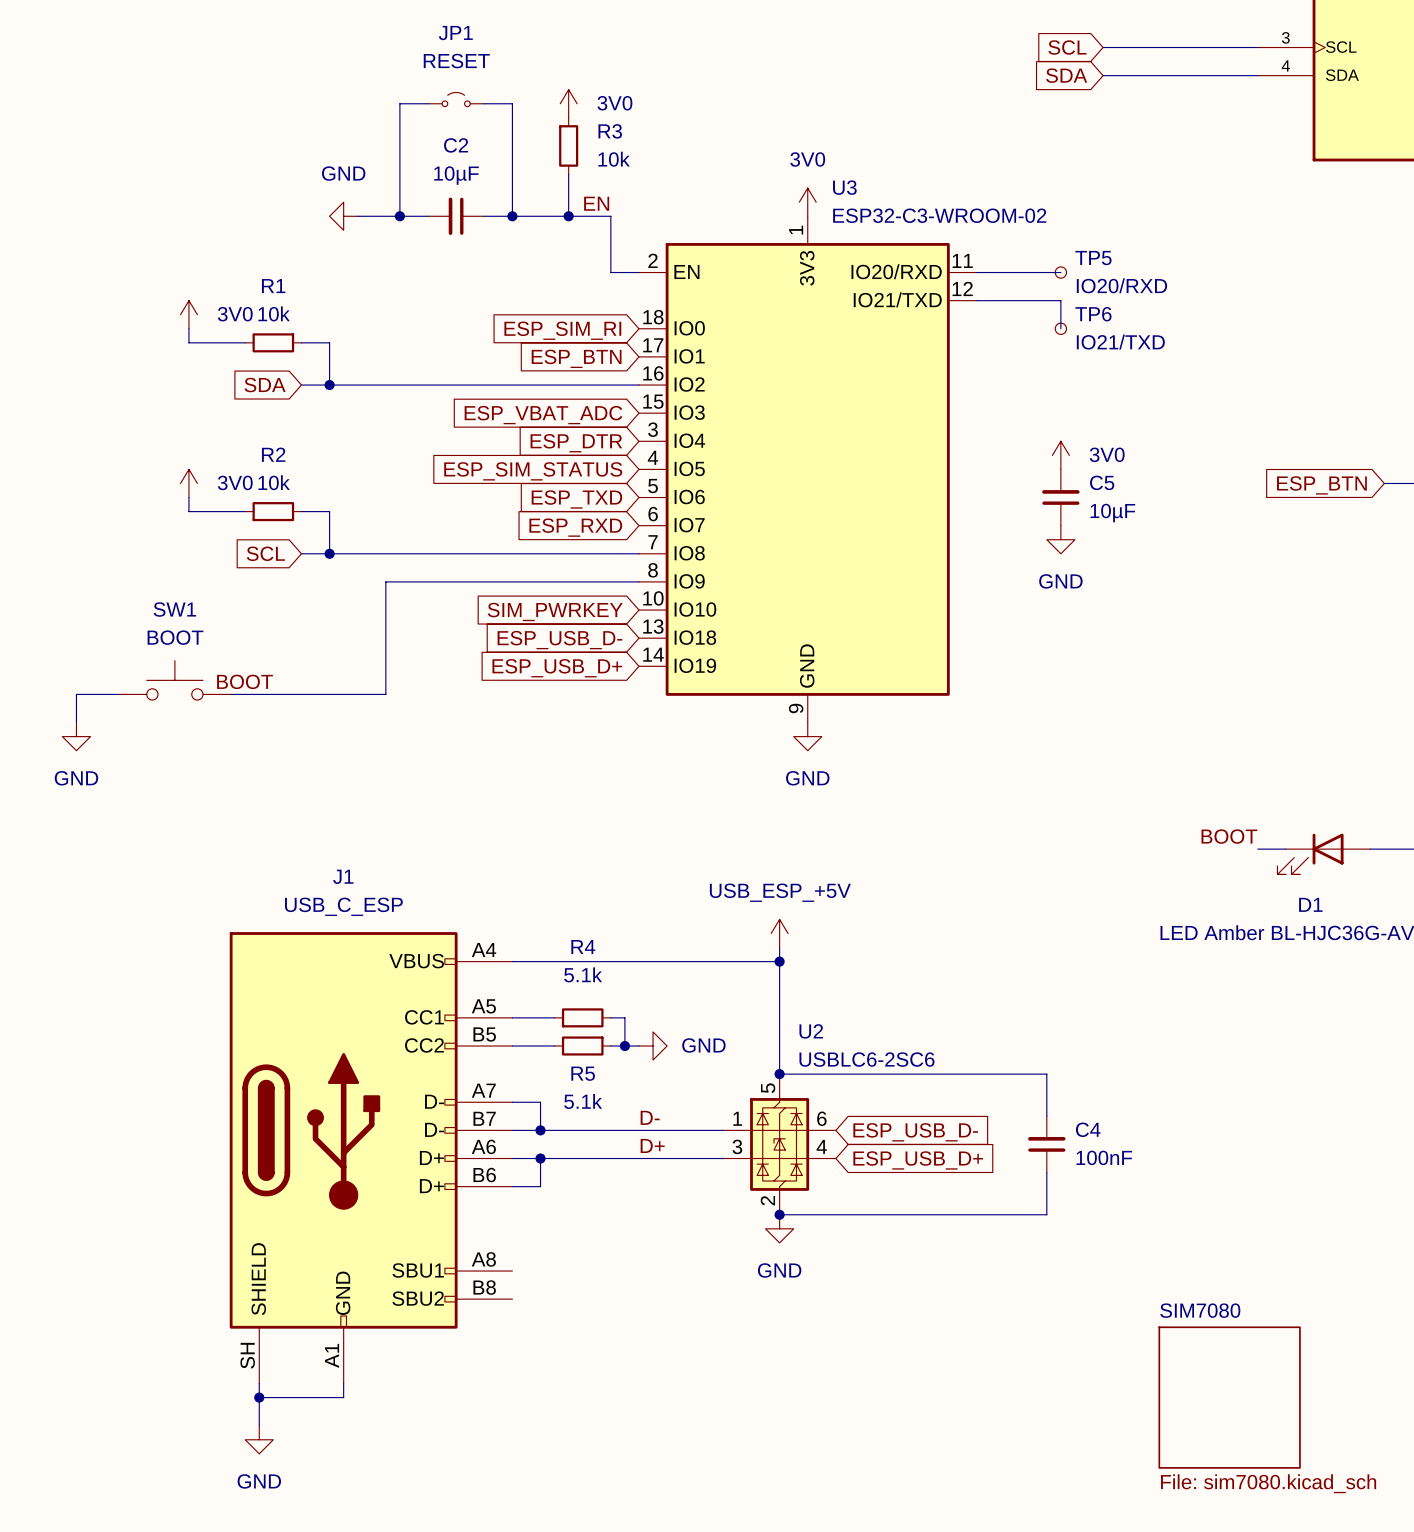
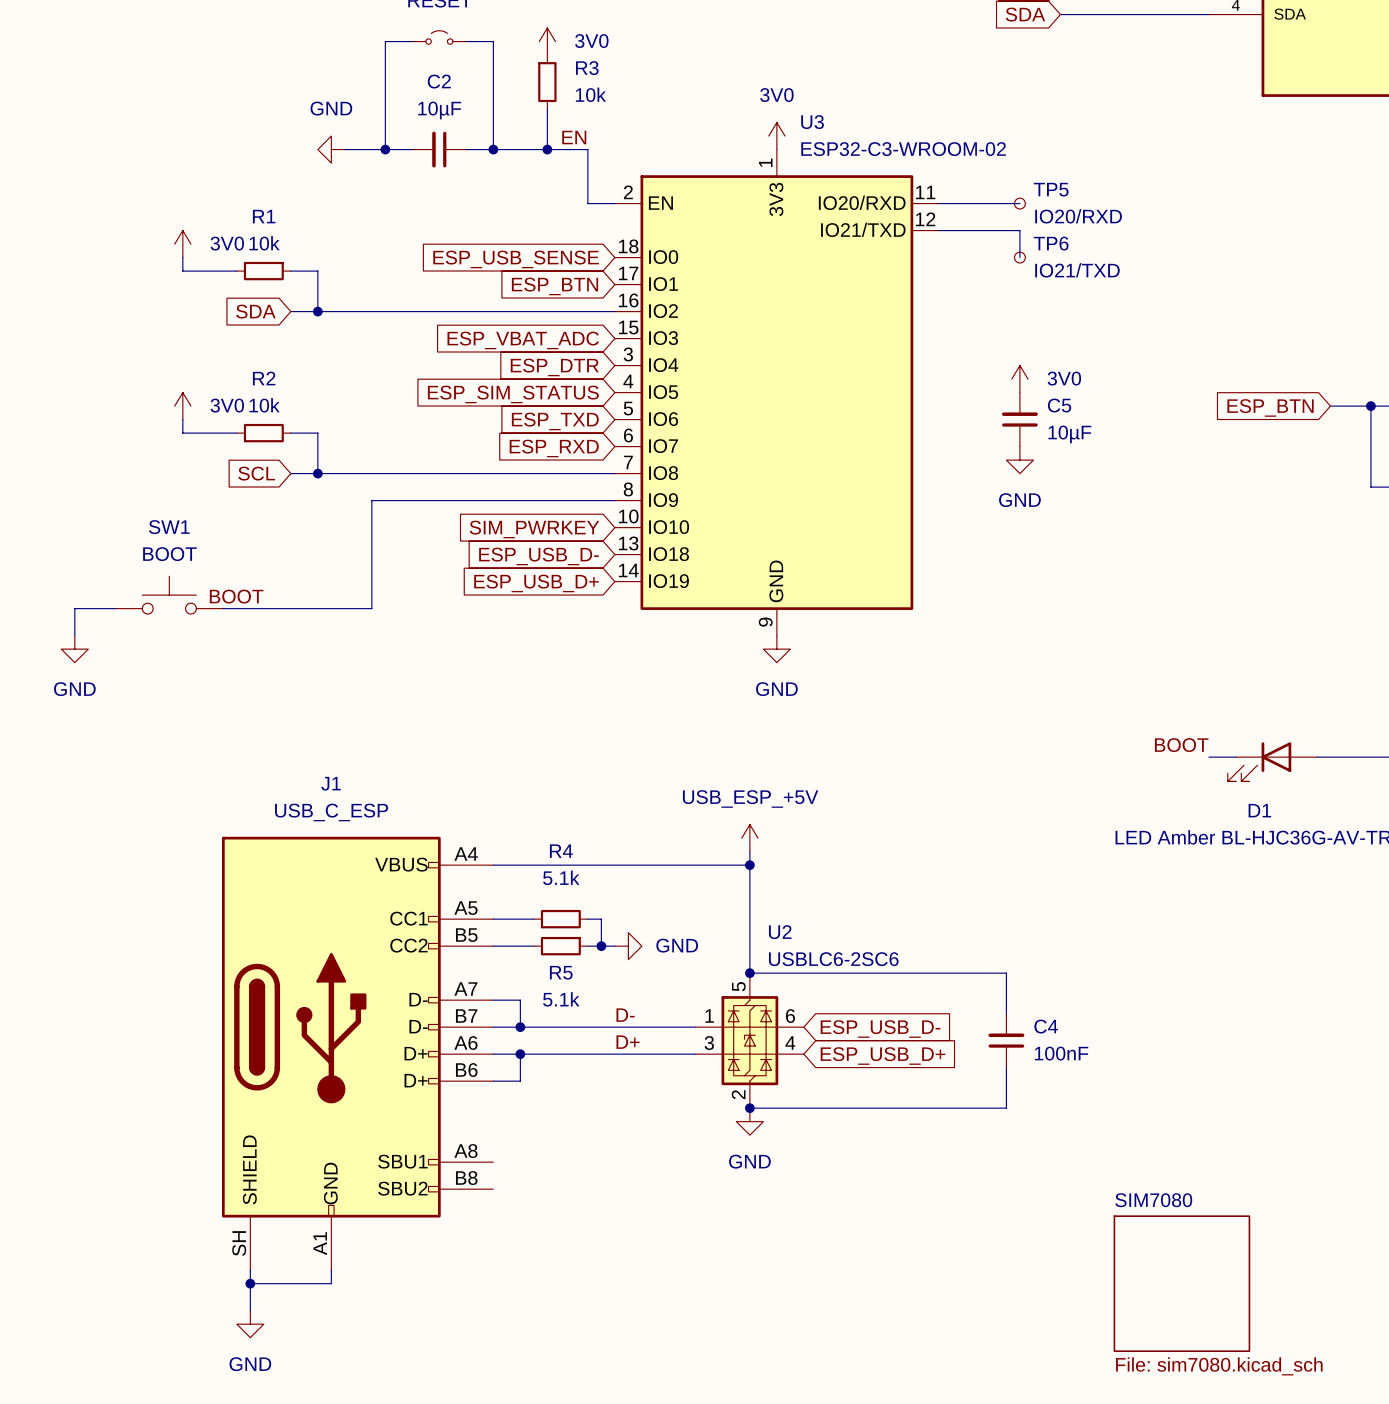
global label: ESP_SIM_RI (562, 330) -> ESP_USB_SENSE (516, 259)

